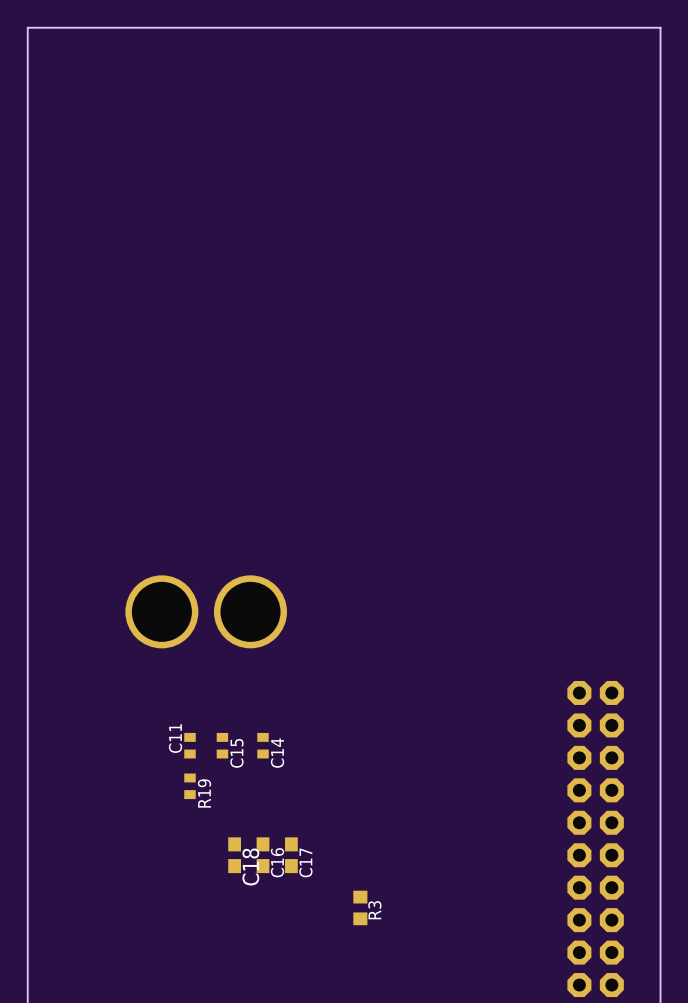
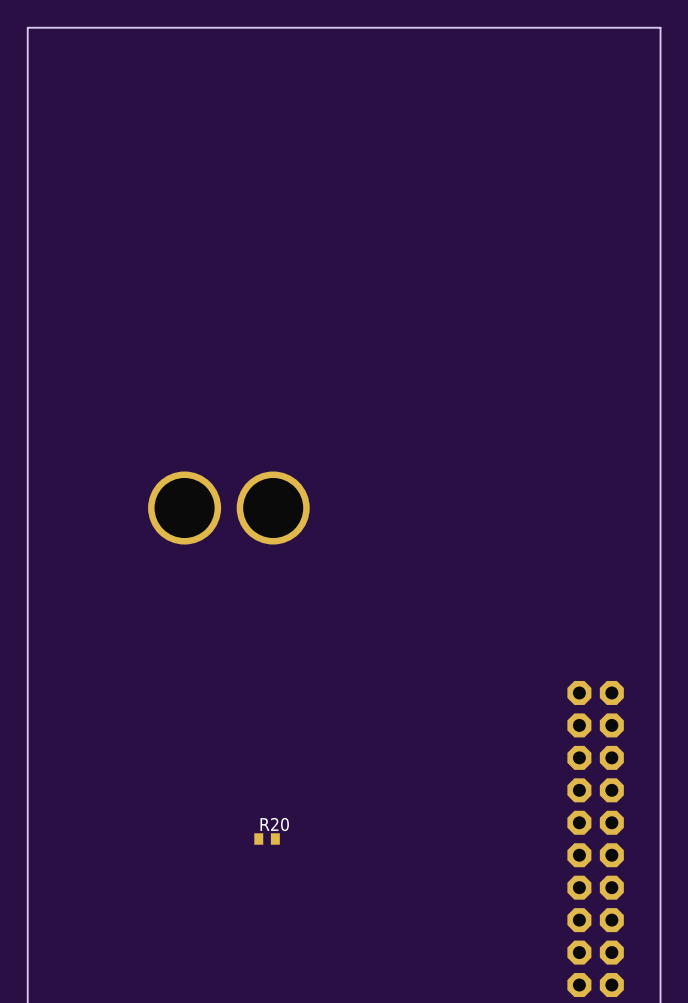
part position: (206, 611) -> (228, 508)
C11: (189, 745) -> none
C15: (222, 745) -> none
C14: (263, 745) -> none
R19: (189, 786) -> none
R20: none -> (267, 839)
C18: (234, 855) -> none
C16: (263, 855) -> none
C17: (291, 855) -> none
R3: (360, 907) -> none

